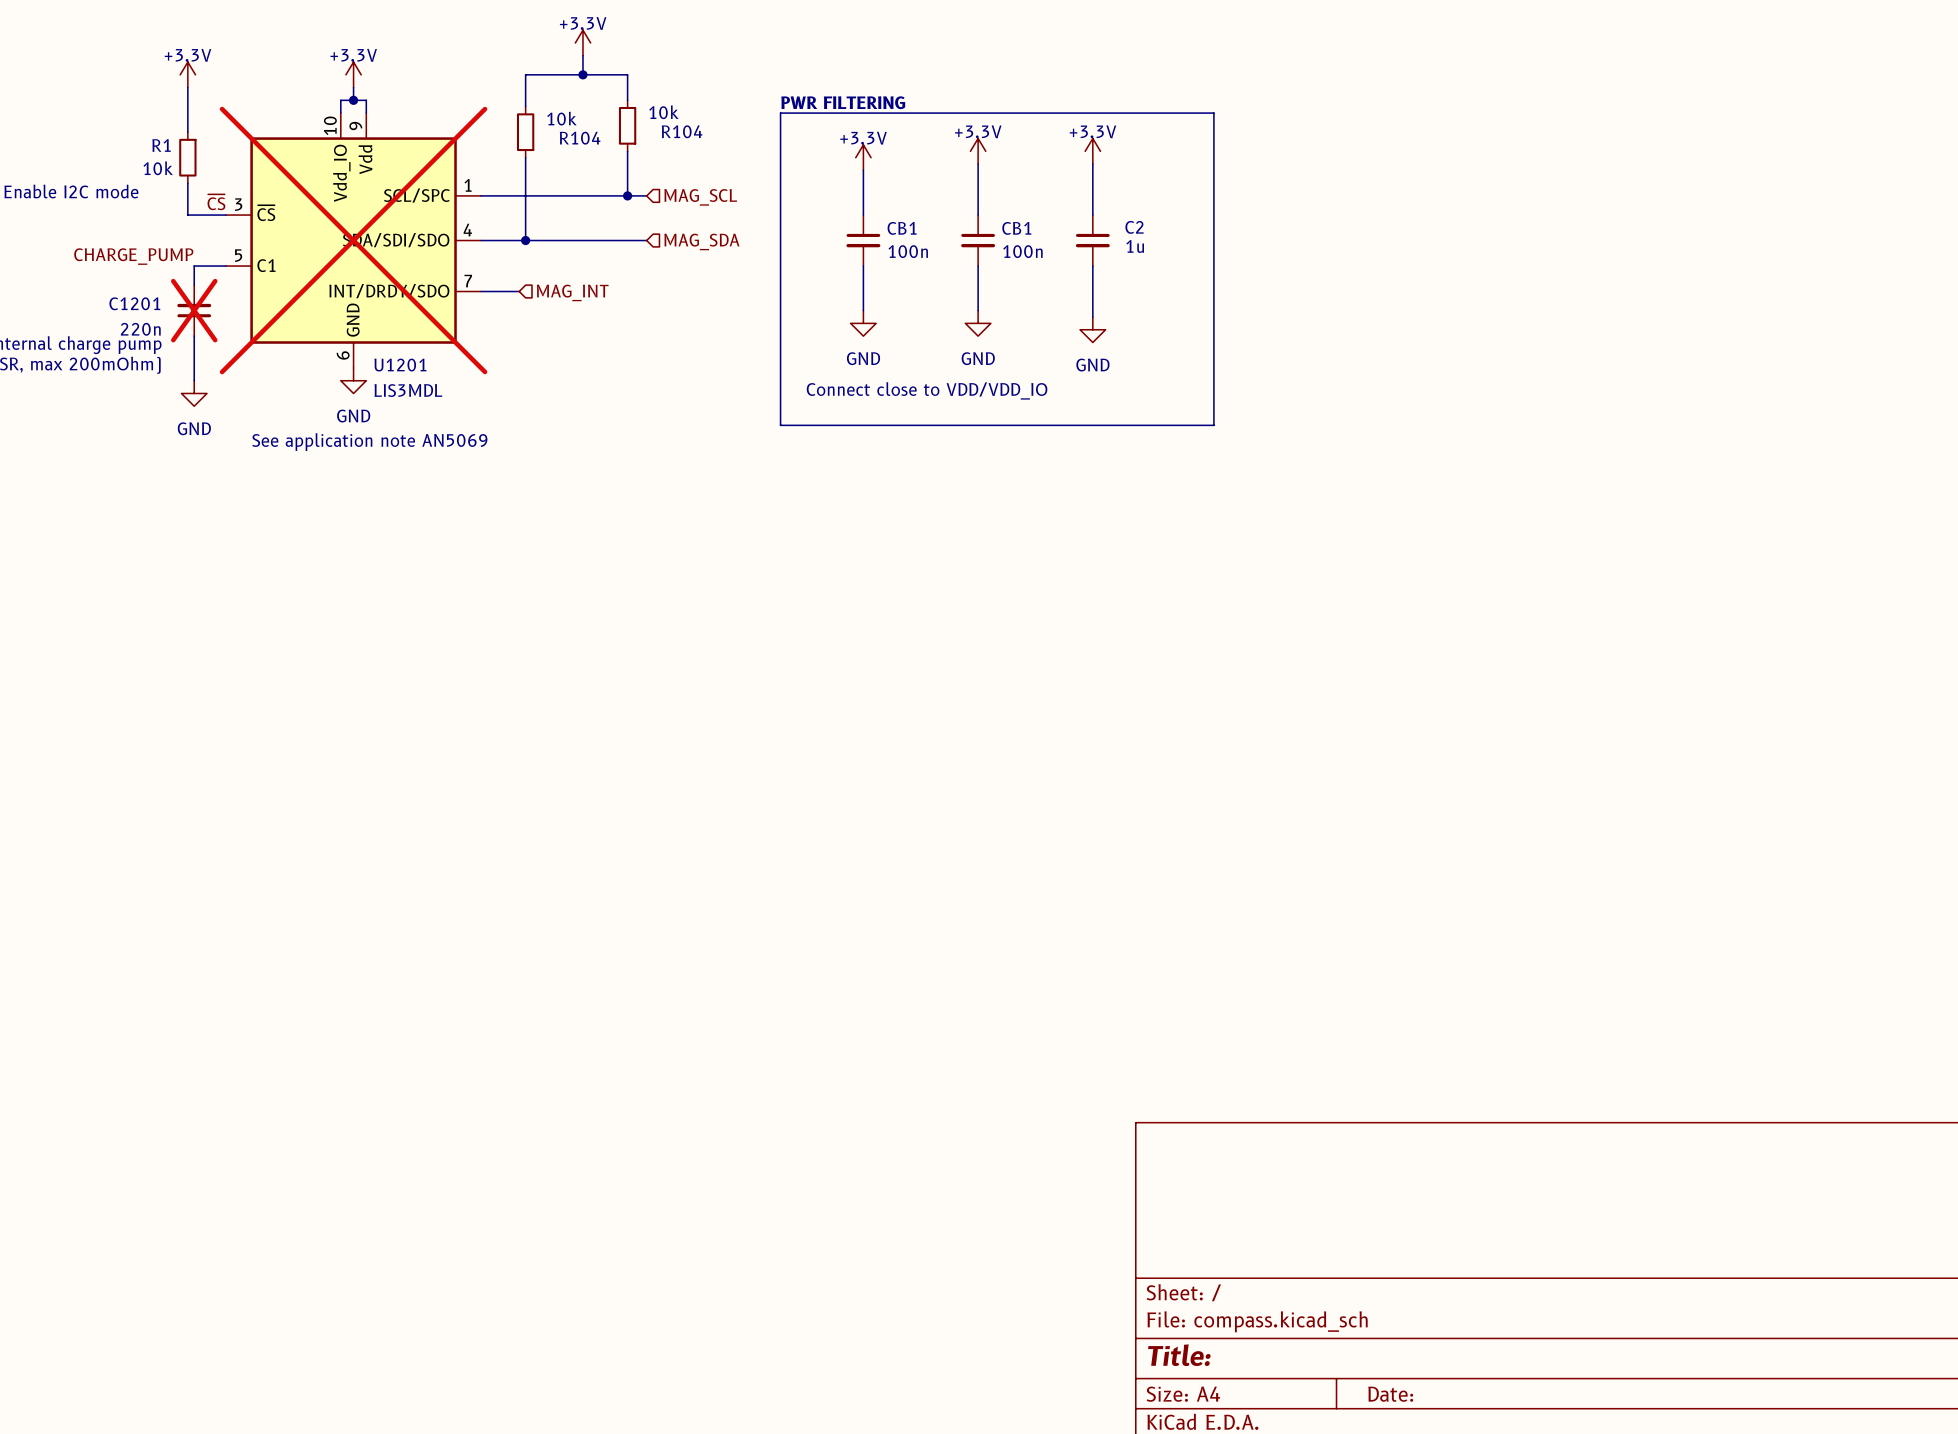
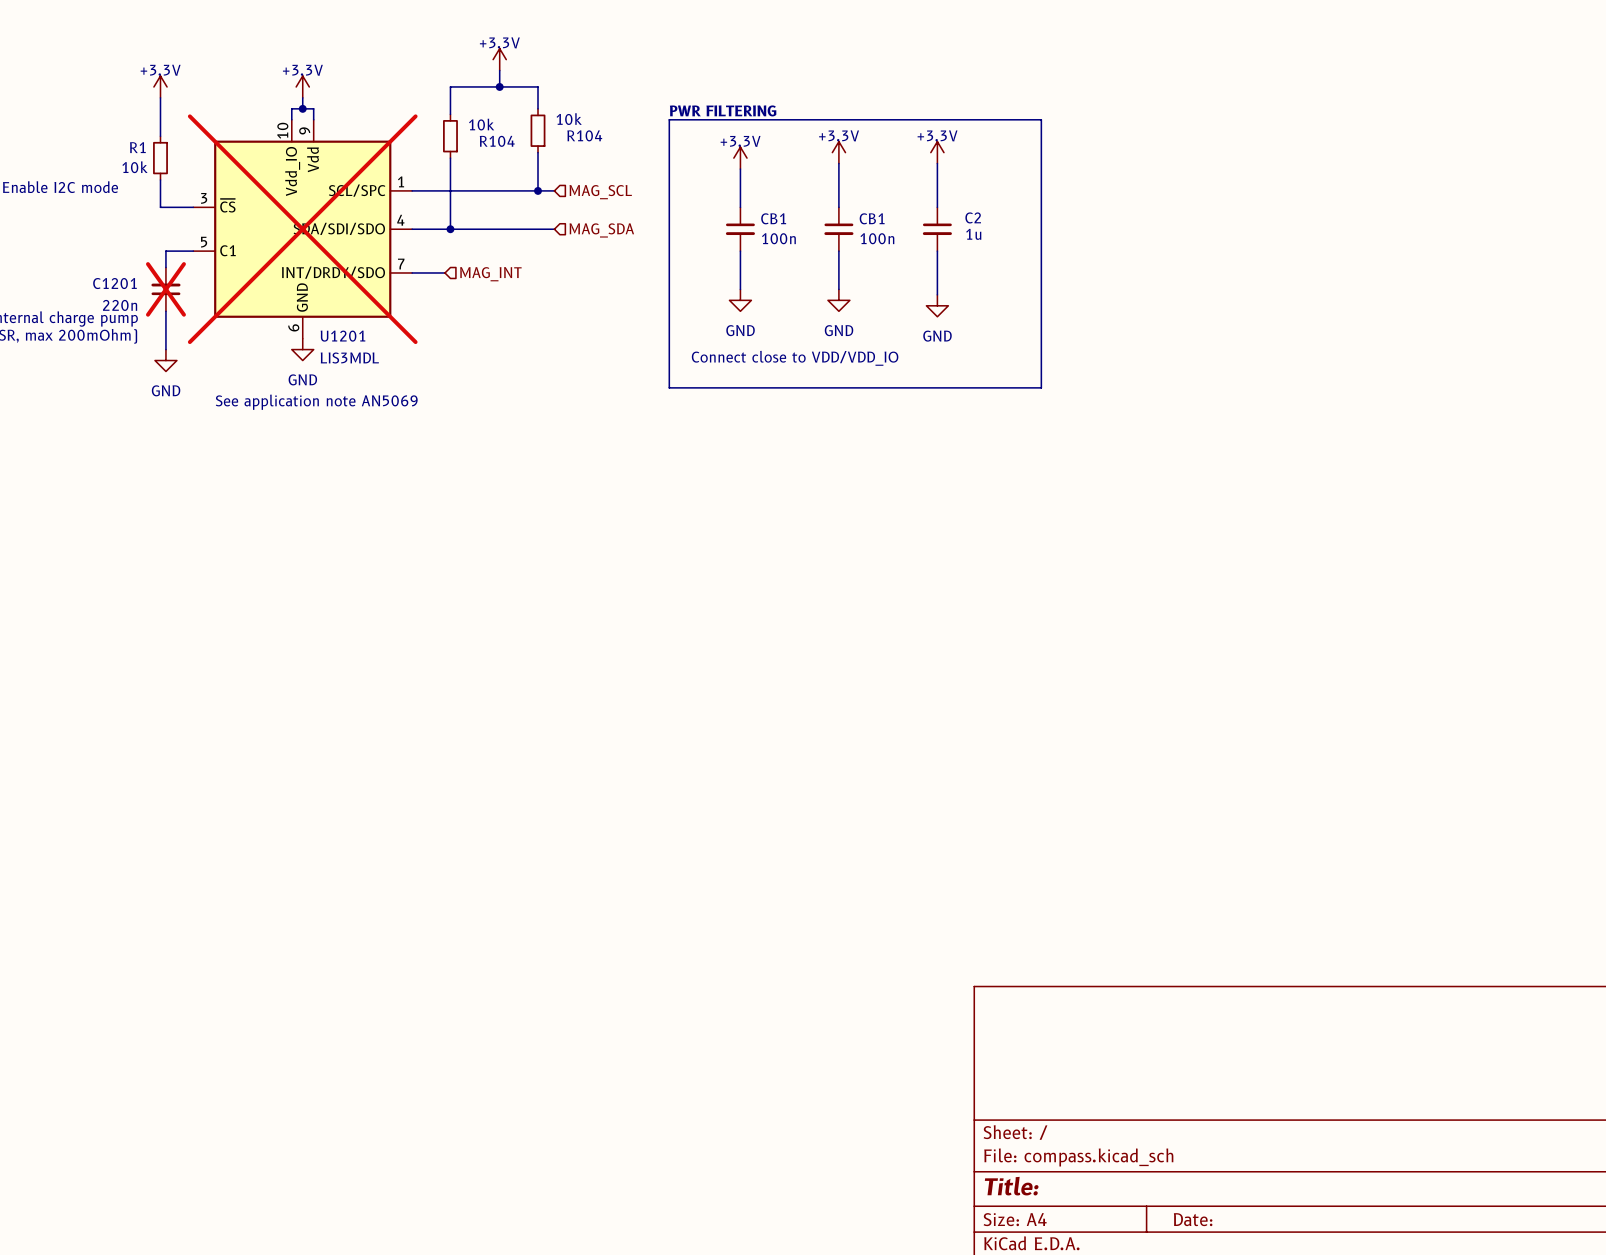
label: ~{CS} (216, 202) -> none
label: CHARGE_PUMP (133, 256) -> none

